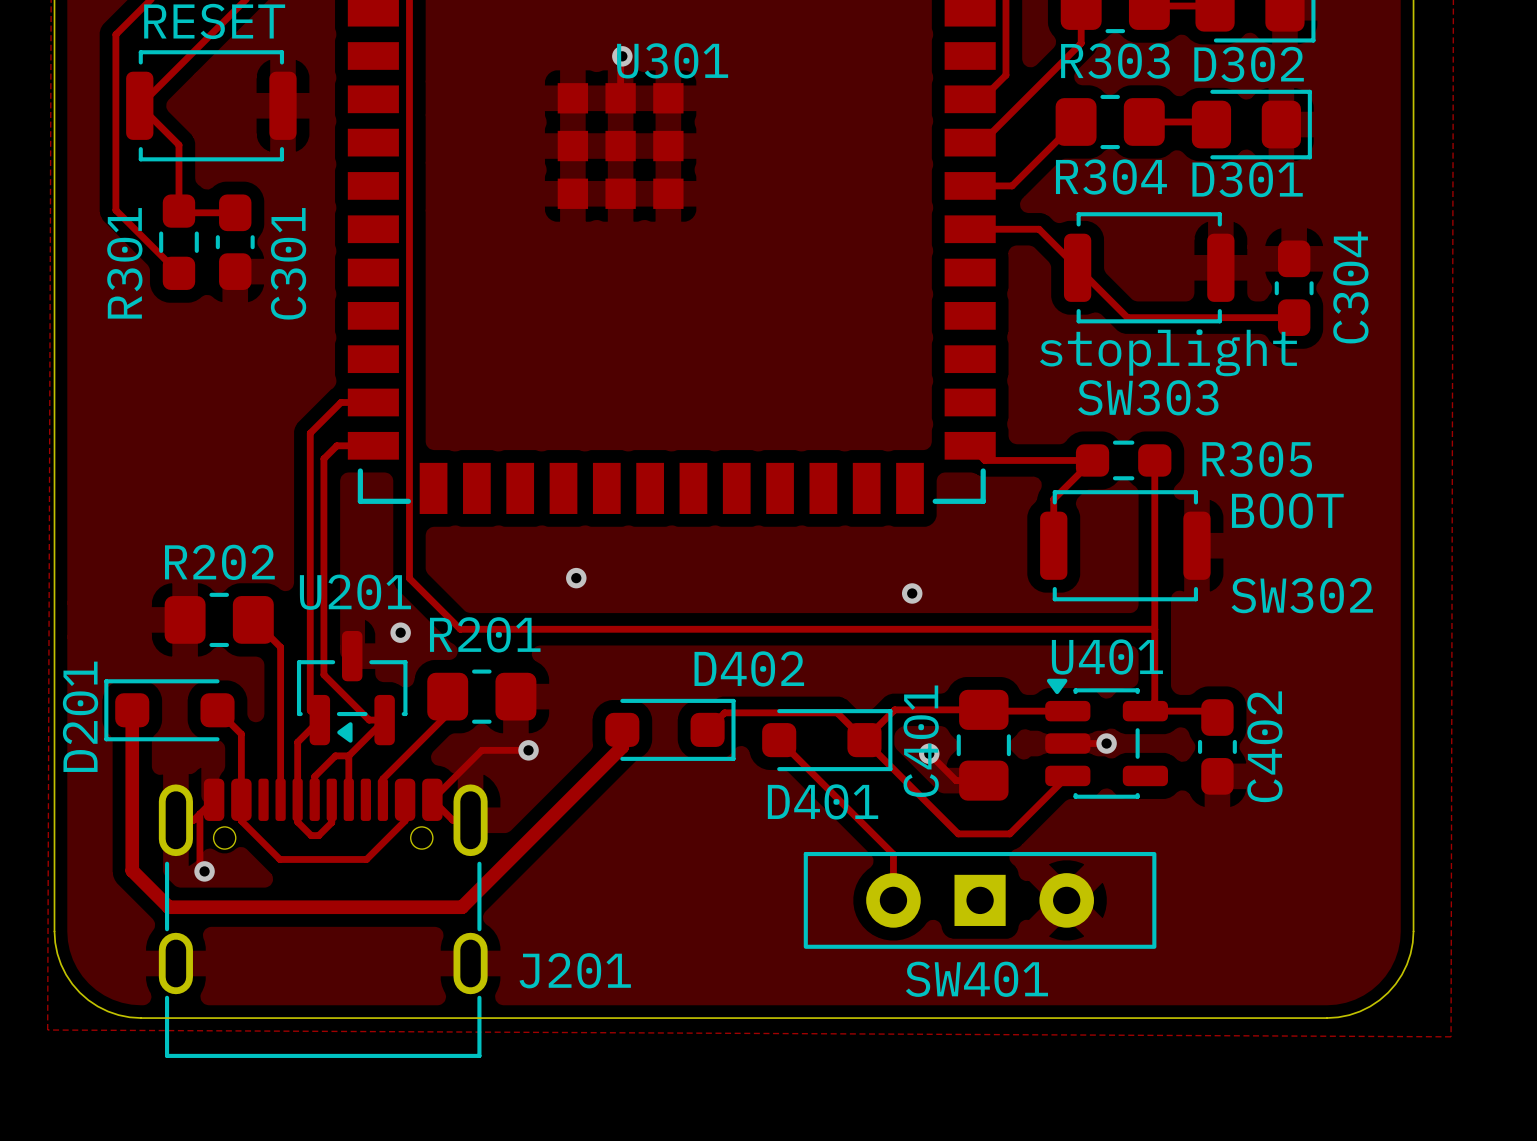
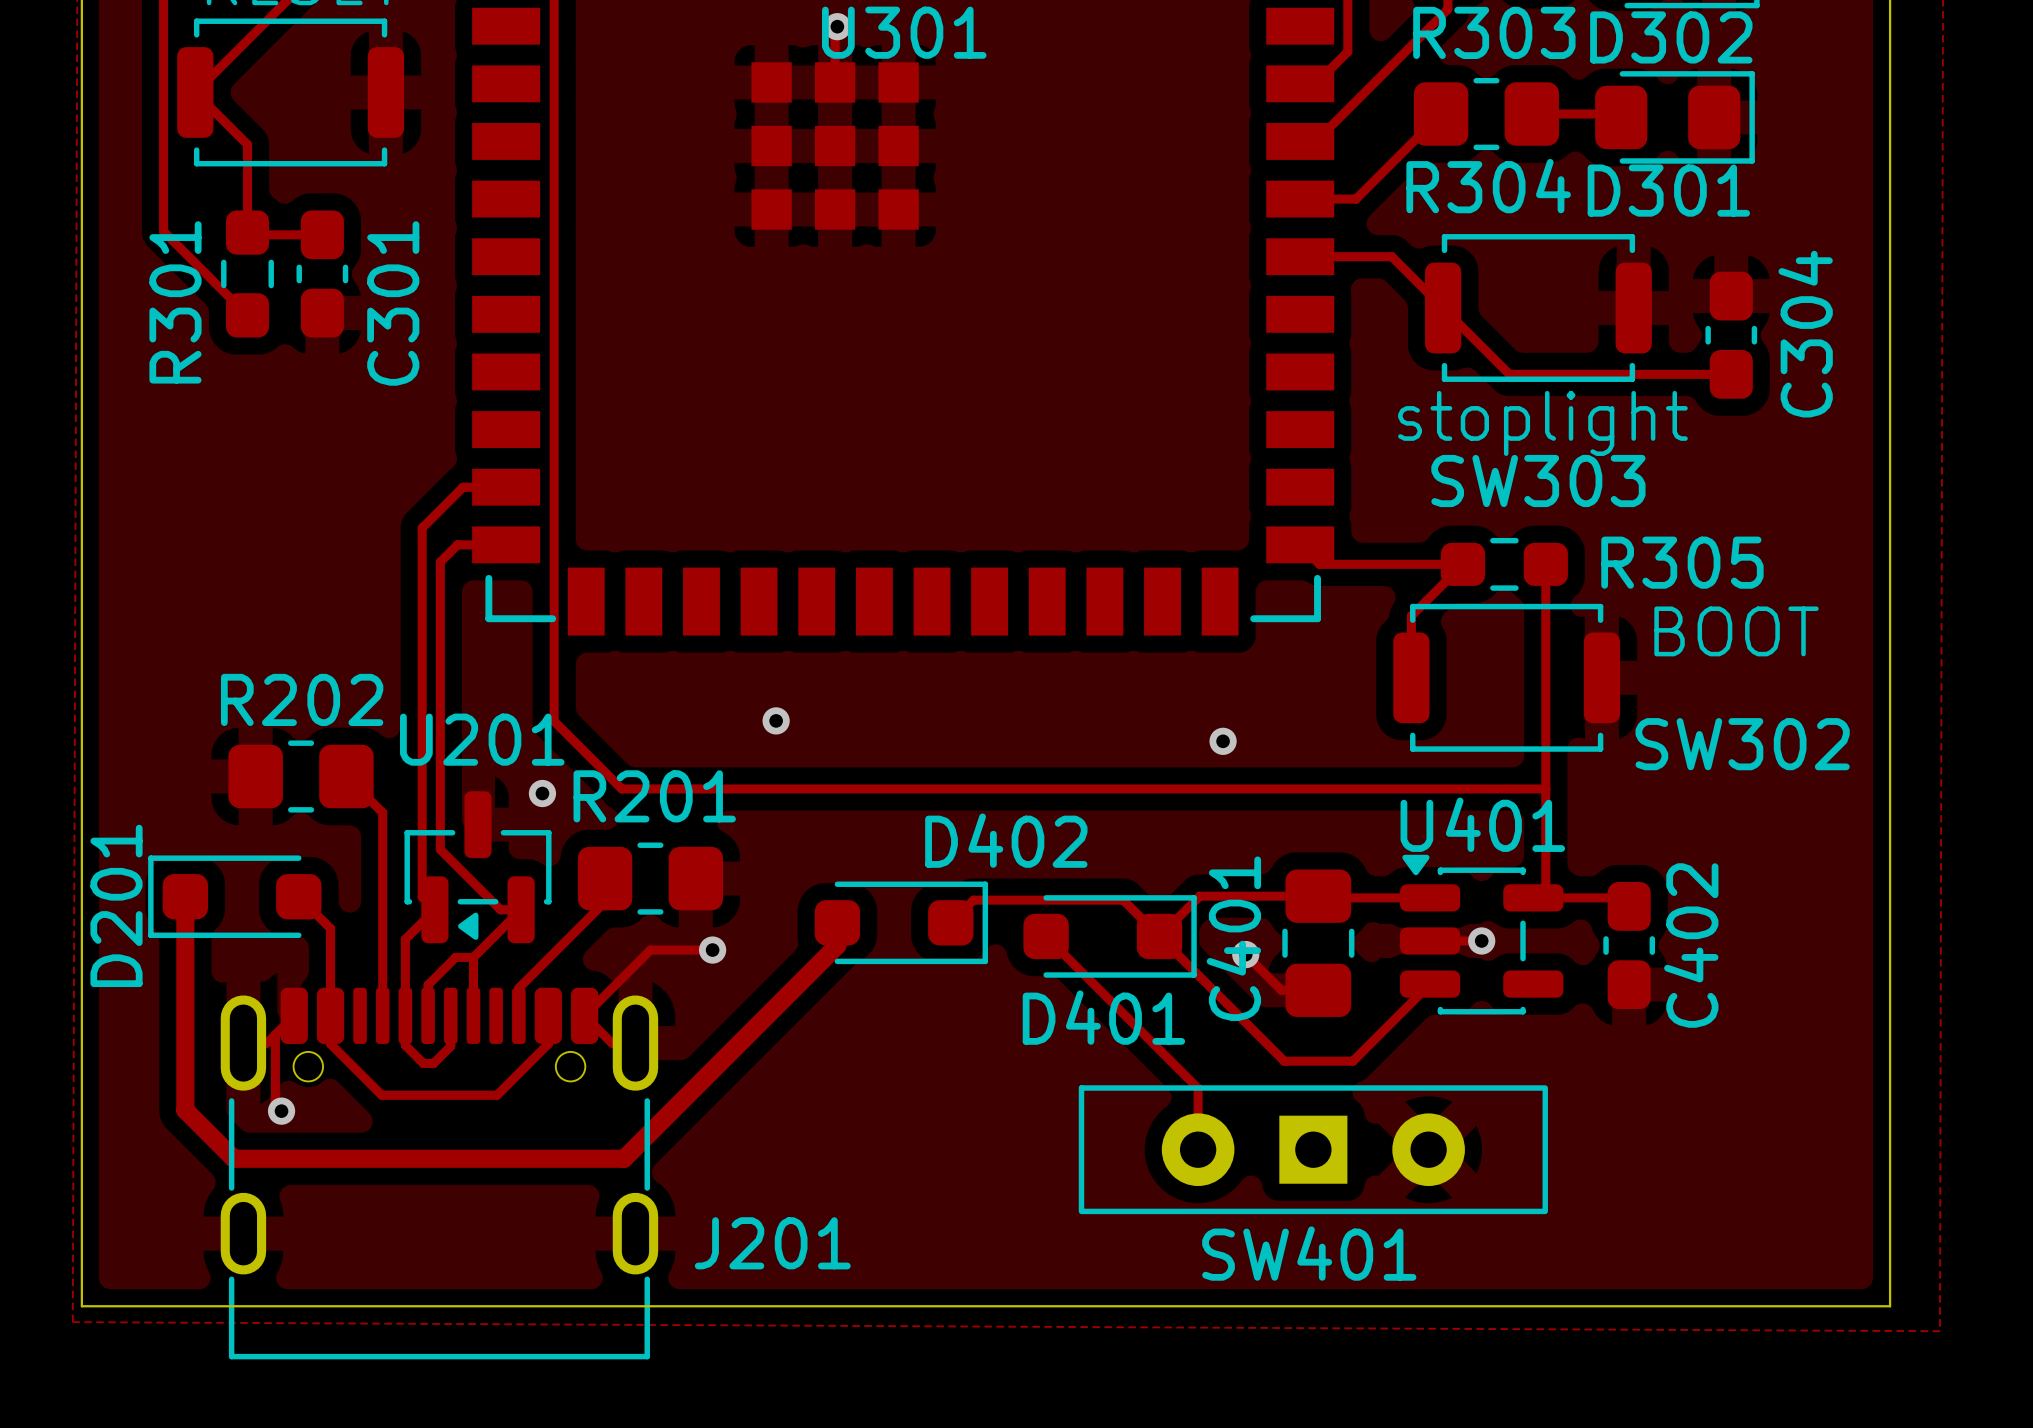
board edge: (54, 931) (61, 964) (79, 992) (107, 1011) (141, 1018) -> (81, 1191) (81, 1306) (197, 1306)
board edge: (1413, 931) (1406, 964) (1388, 992) (1360, 1011) (1326, 1018) -> (1890, 1191) (1890, 1306) (1774, 1306)

